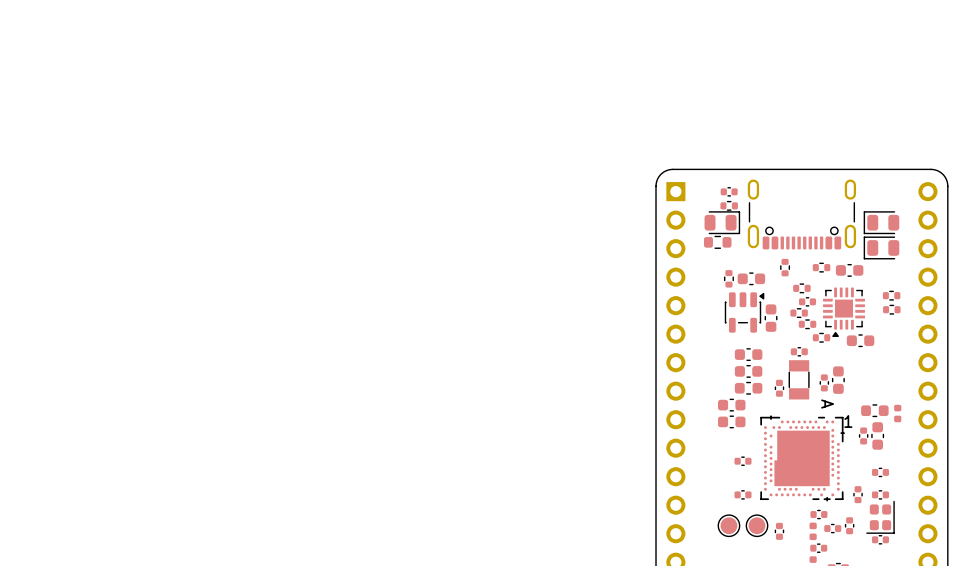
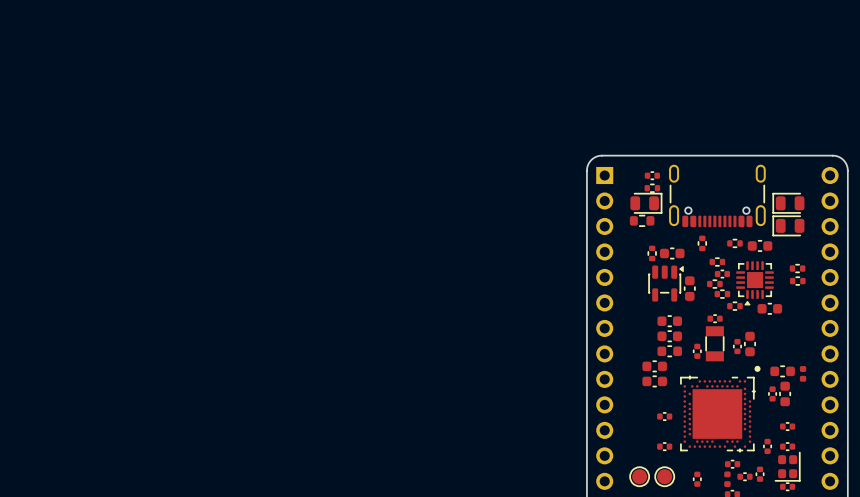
drawing: none -> [754, 365, 761, 372]
part footprint: [760, 415, 845, 502] -> [680, 375, 756, 453]
part: (728, 525) -> none
part: (757, 525) -> none
part: none -> (639, 476)
part: none -> (664, 476)

